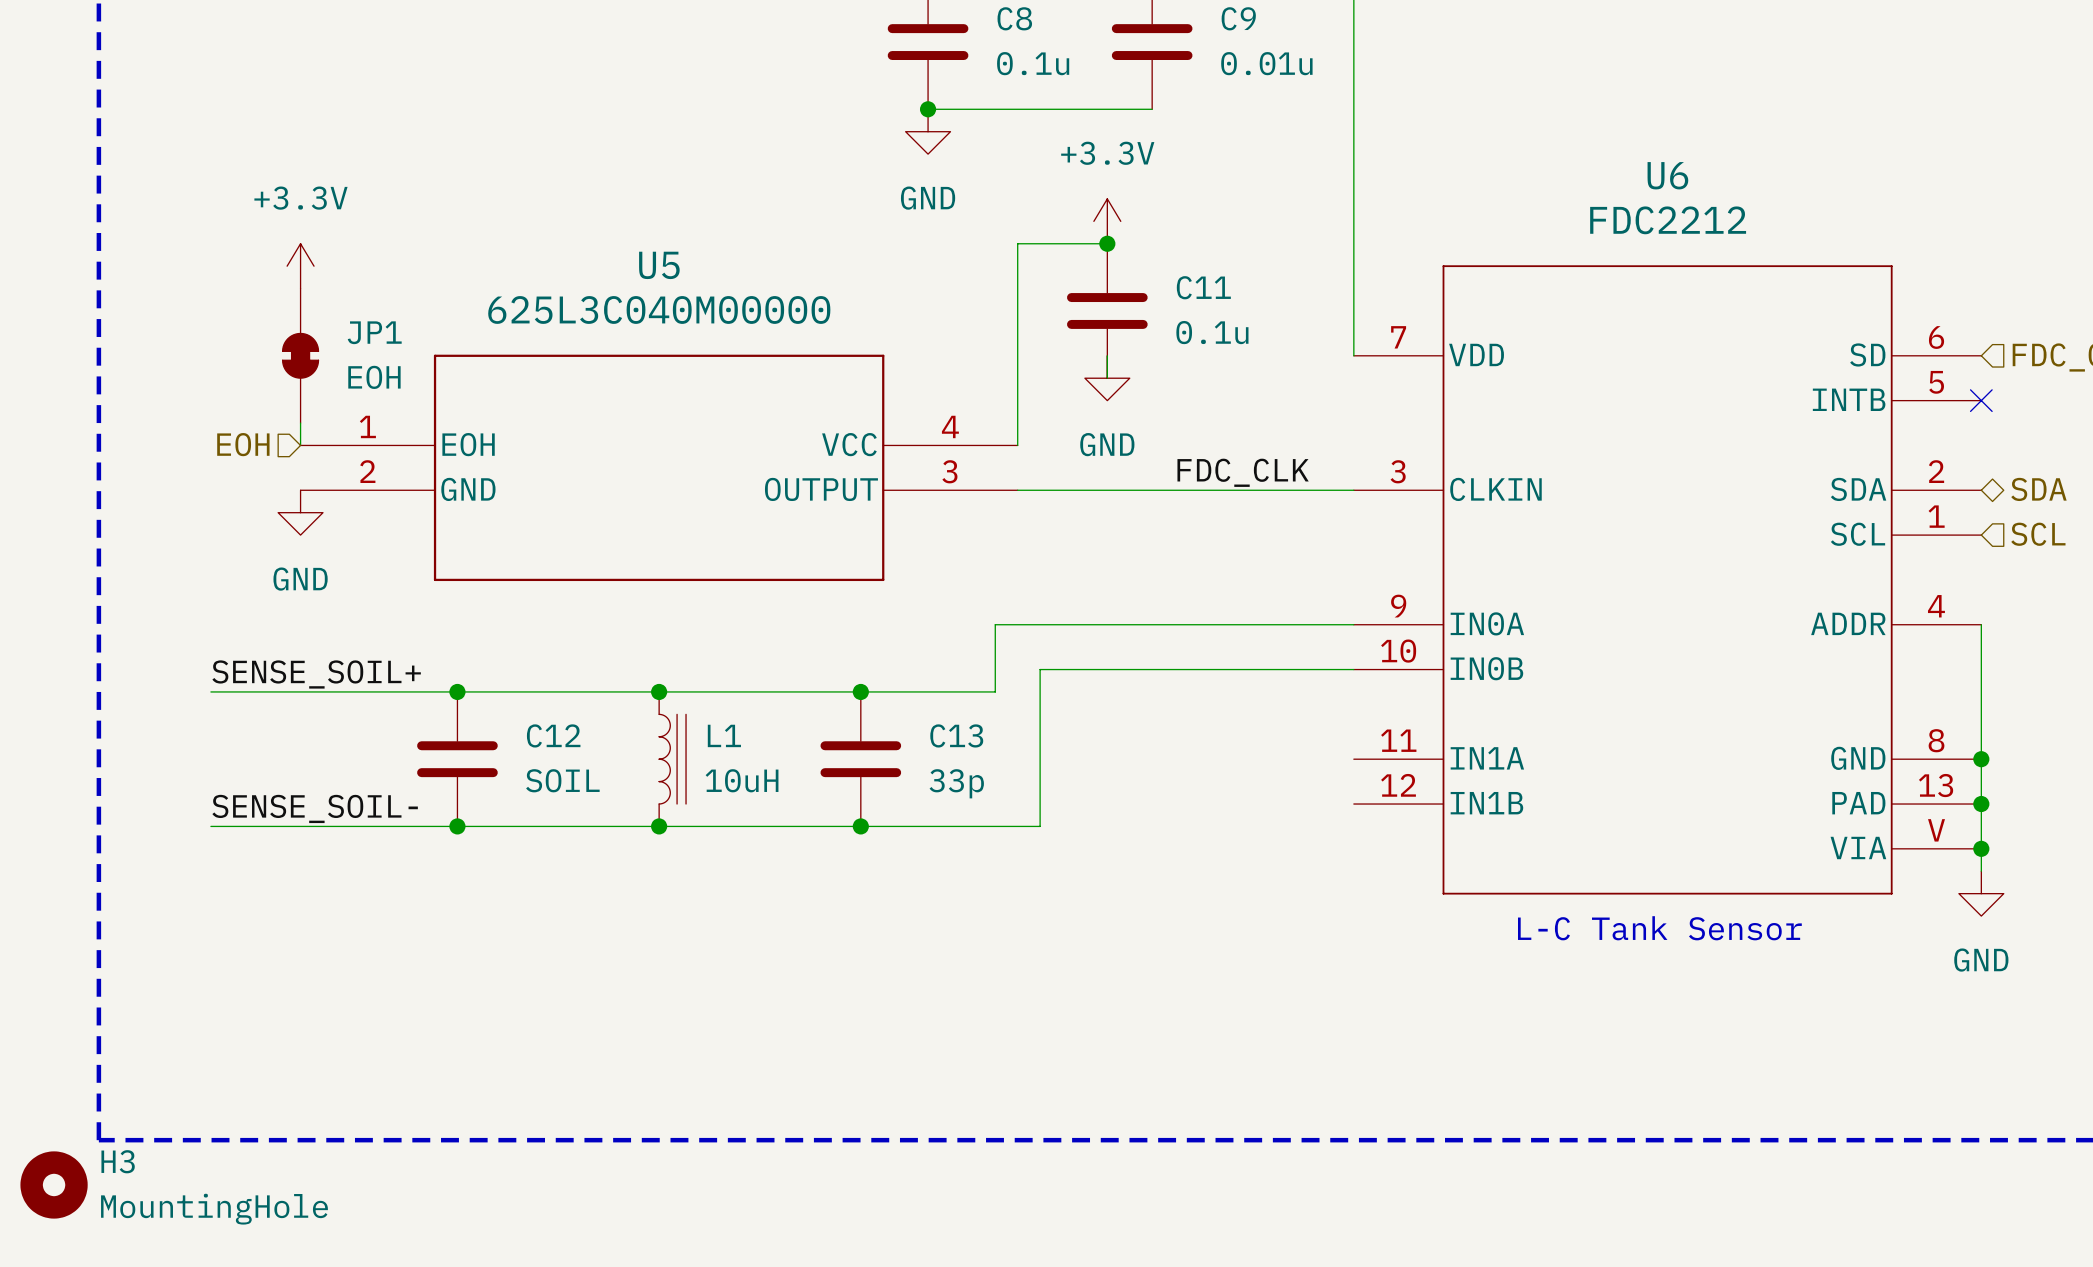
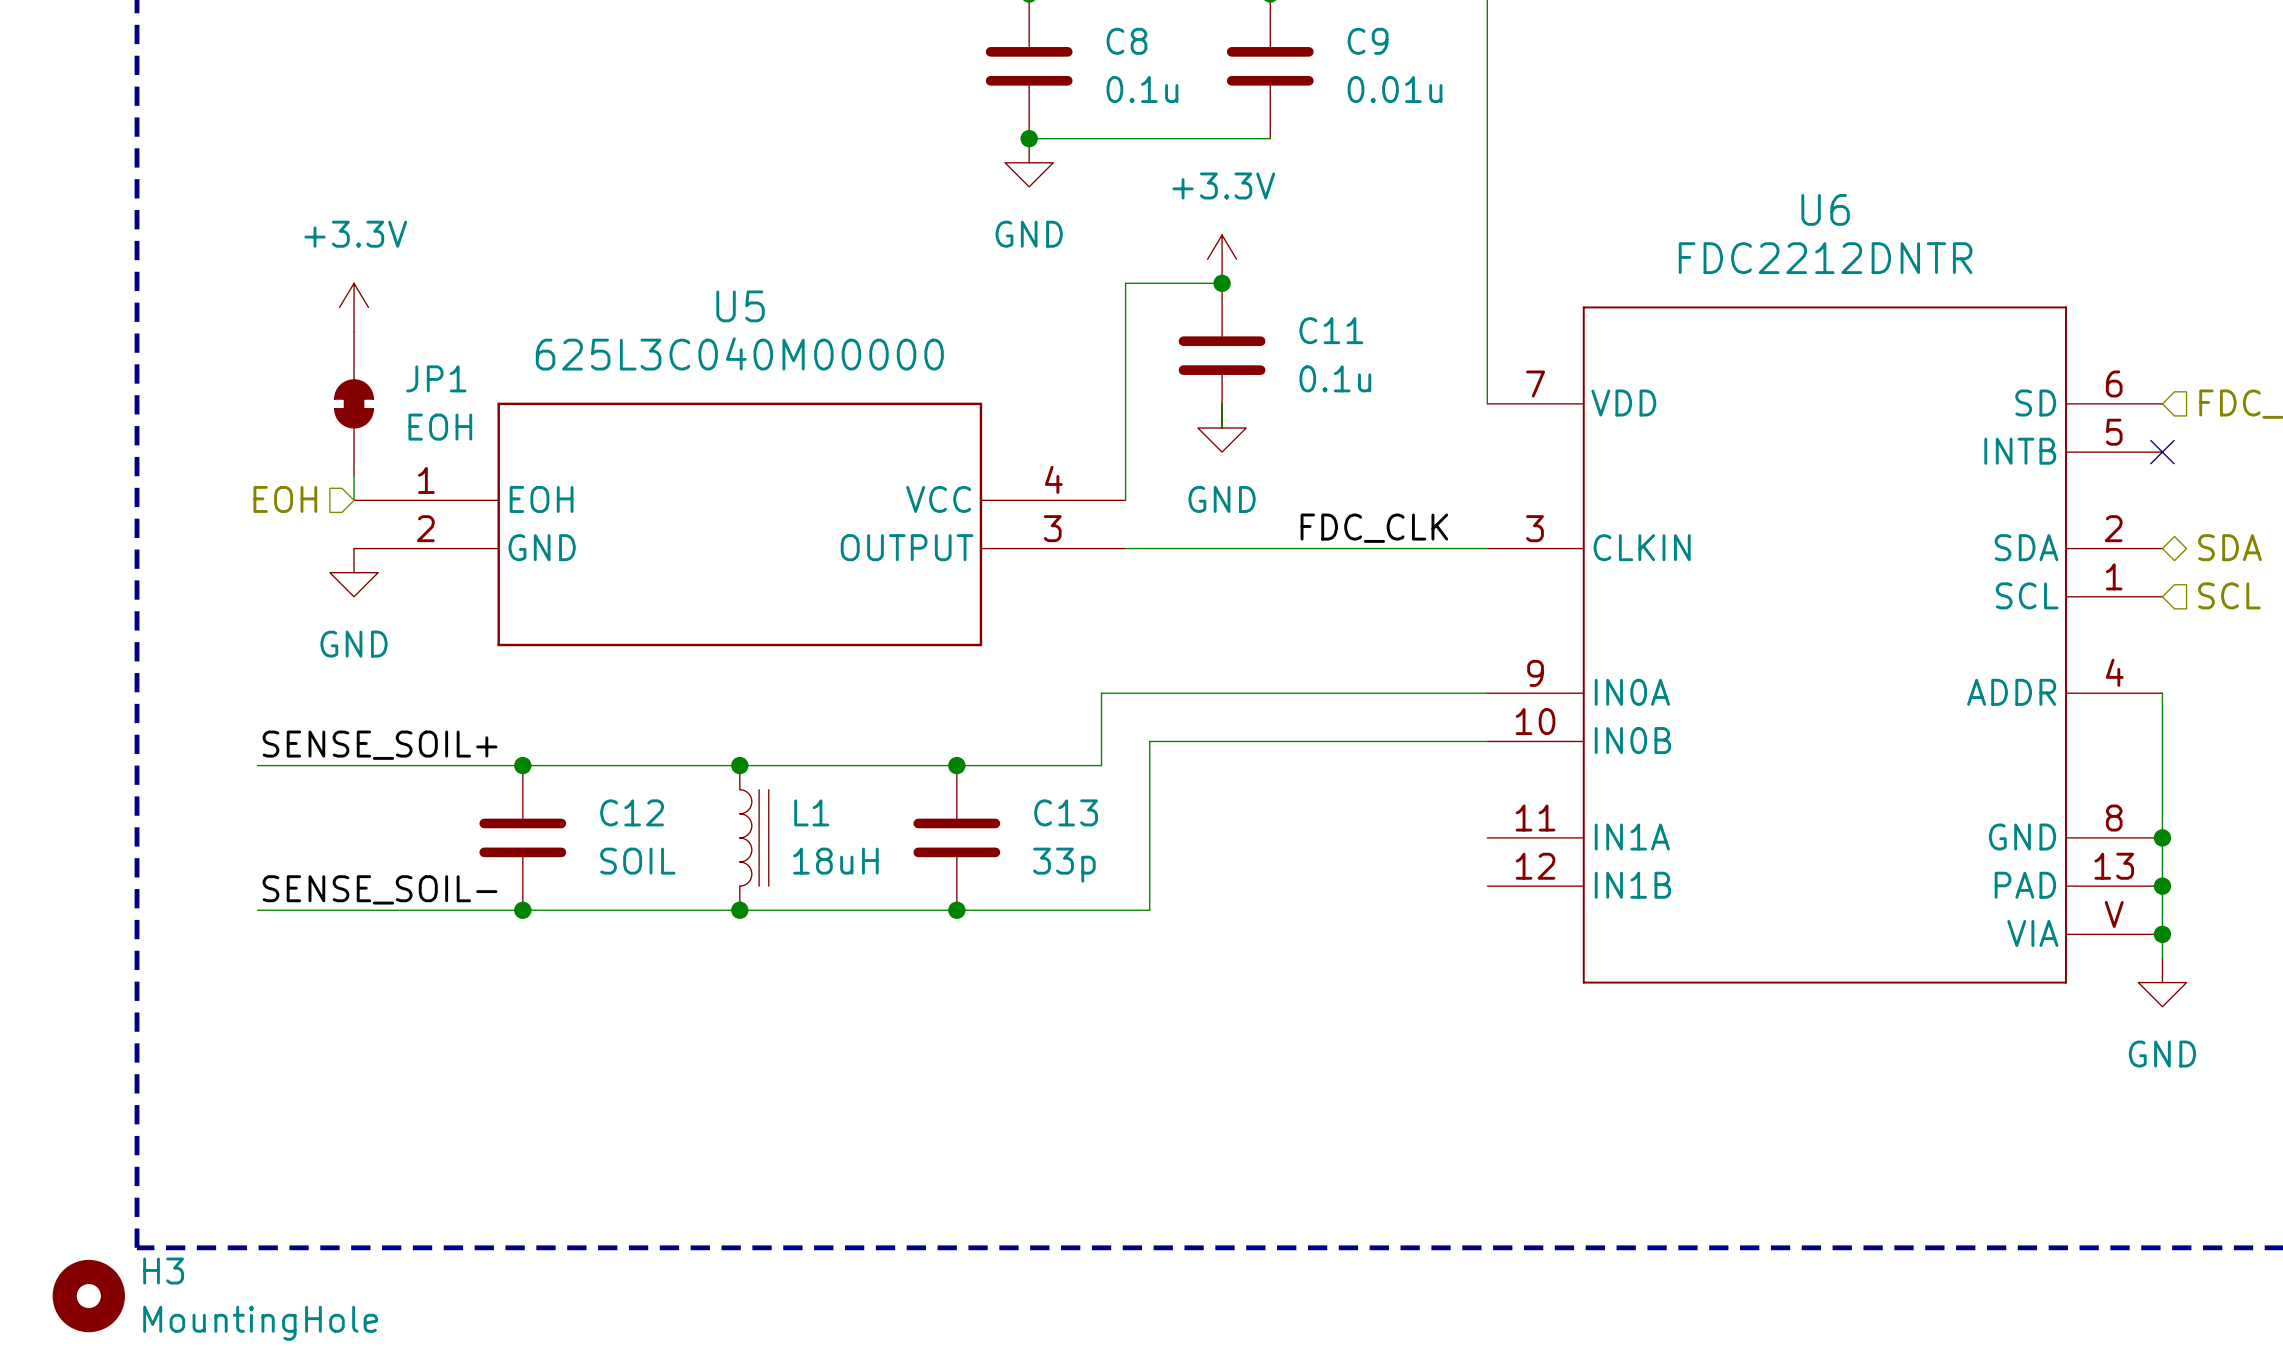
U6 value: FDC2212 (1668, 220) -> FDC2212DNTR (1825, 258)
L1 value: 10uH (742, 780) -> 18uH (835, 861)
text: L-C Tank Sensor (1659, 928) -> none

